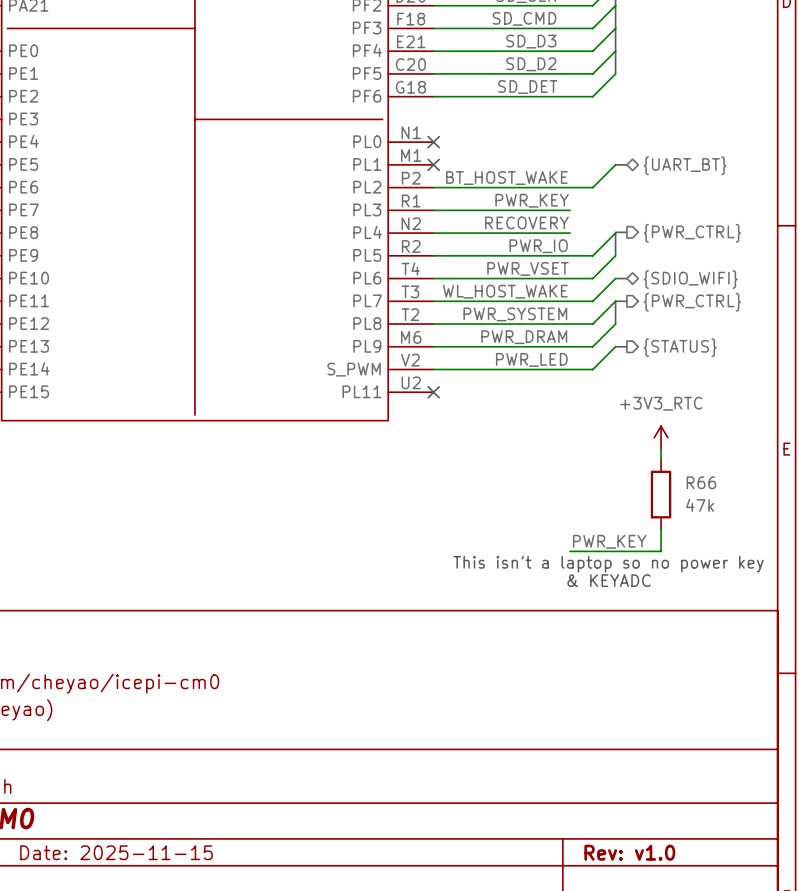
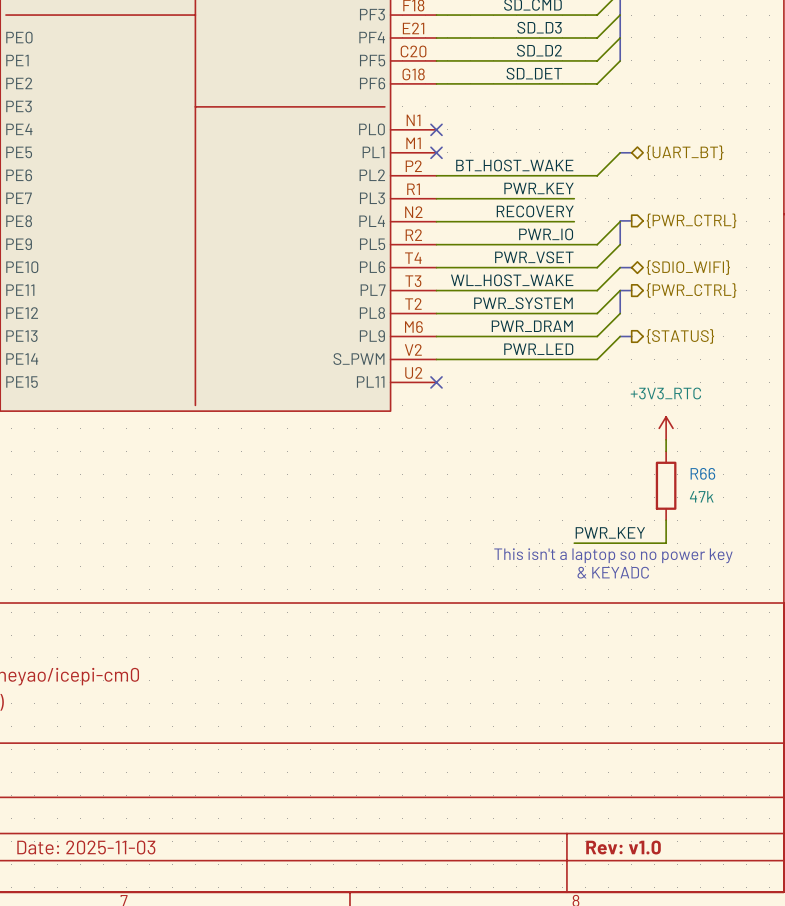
title block: Date: 2025-11-15 (116, 852) -> Date: 2025-11-03 (86, 847)

